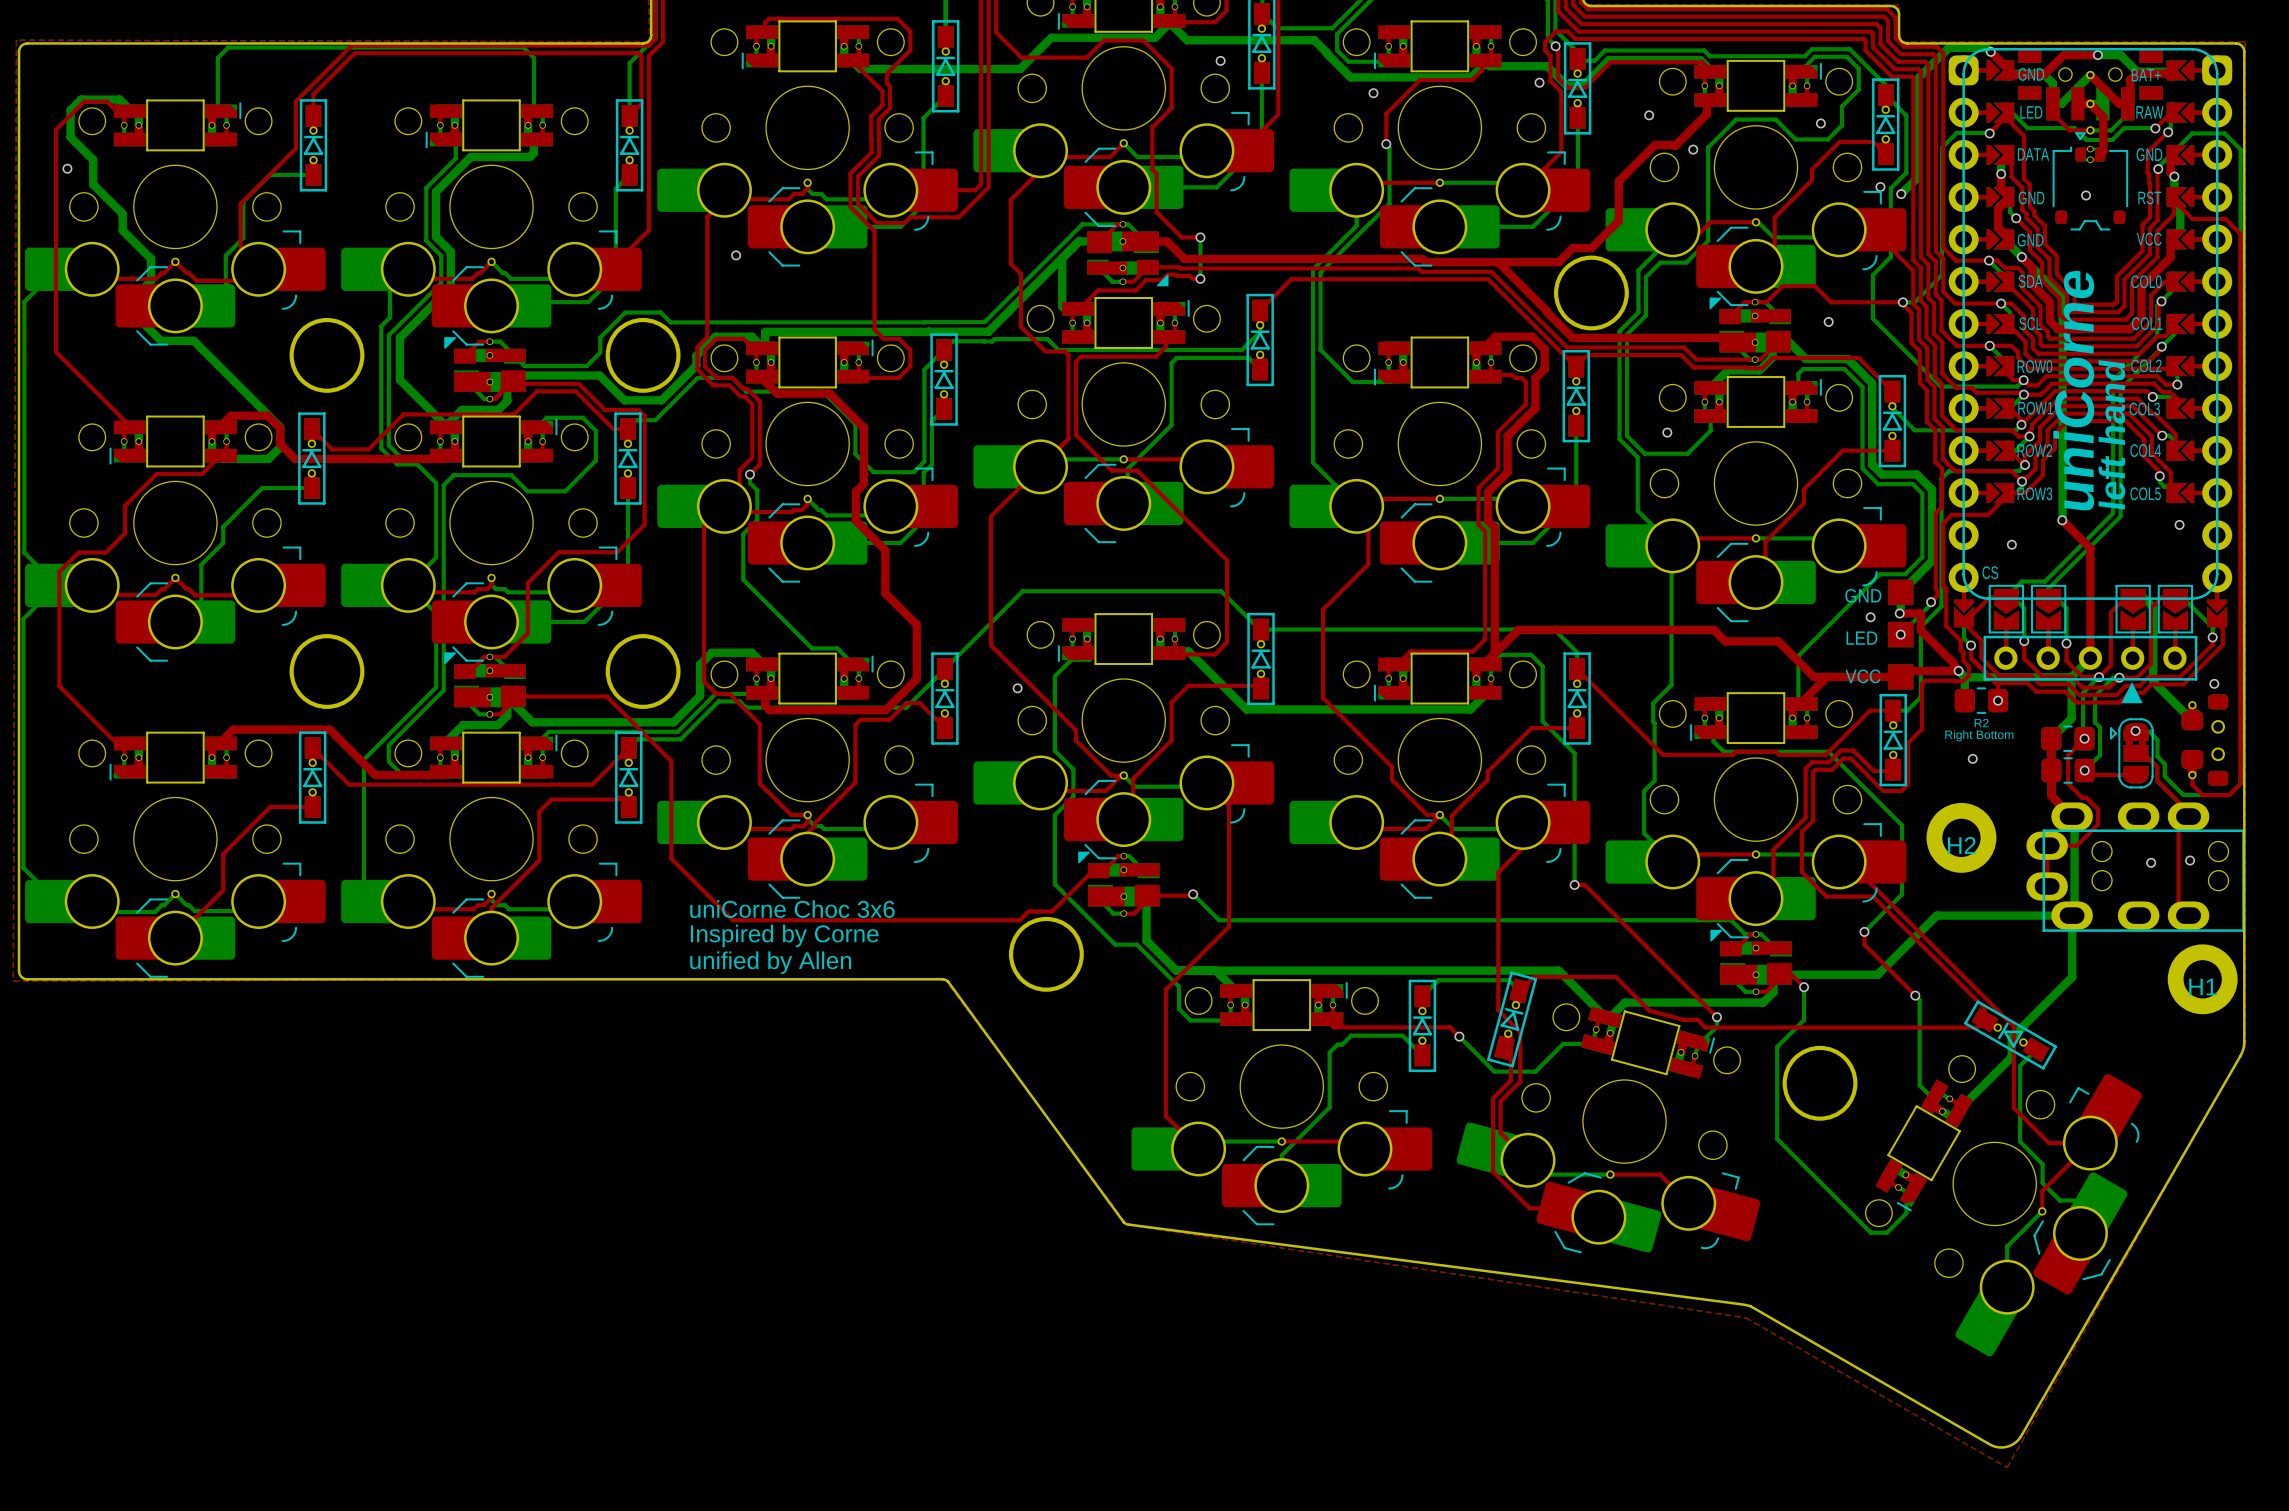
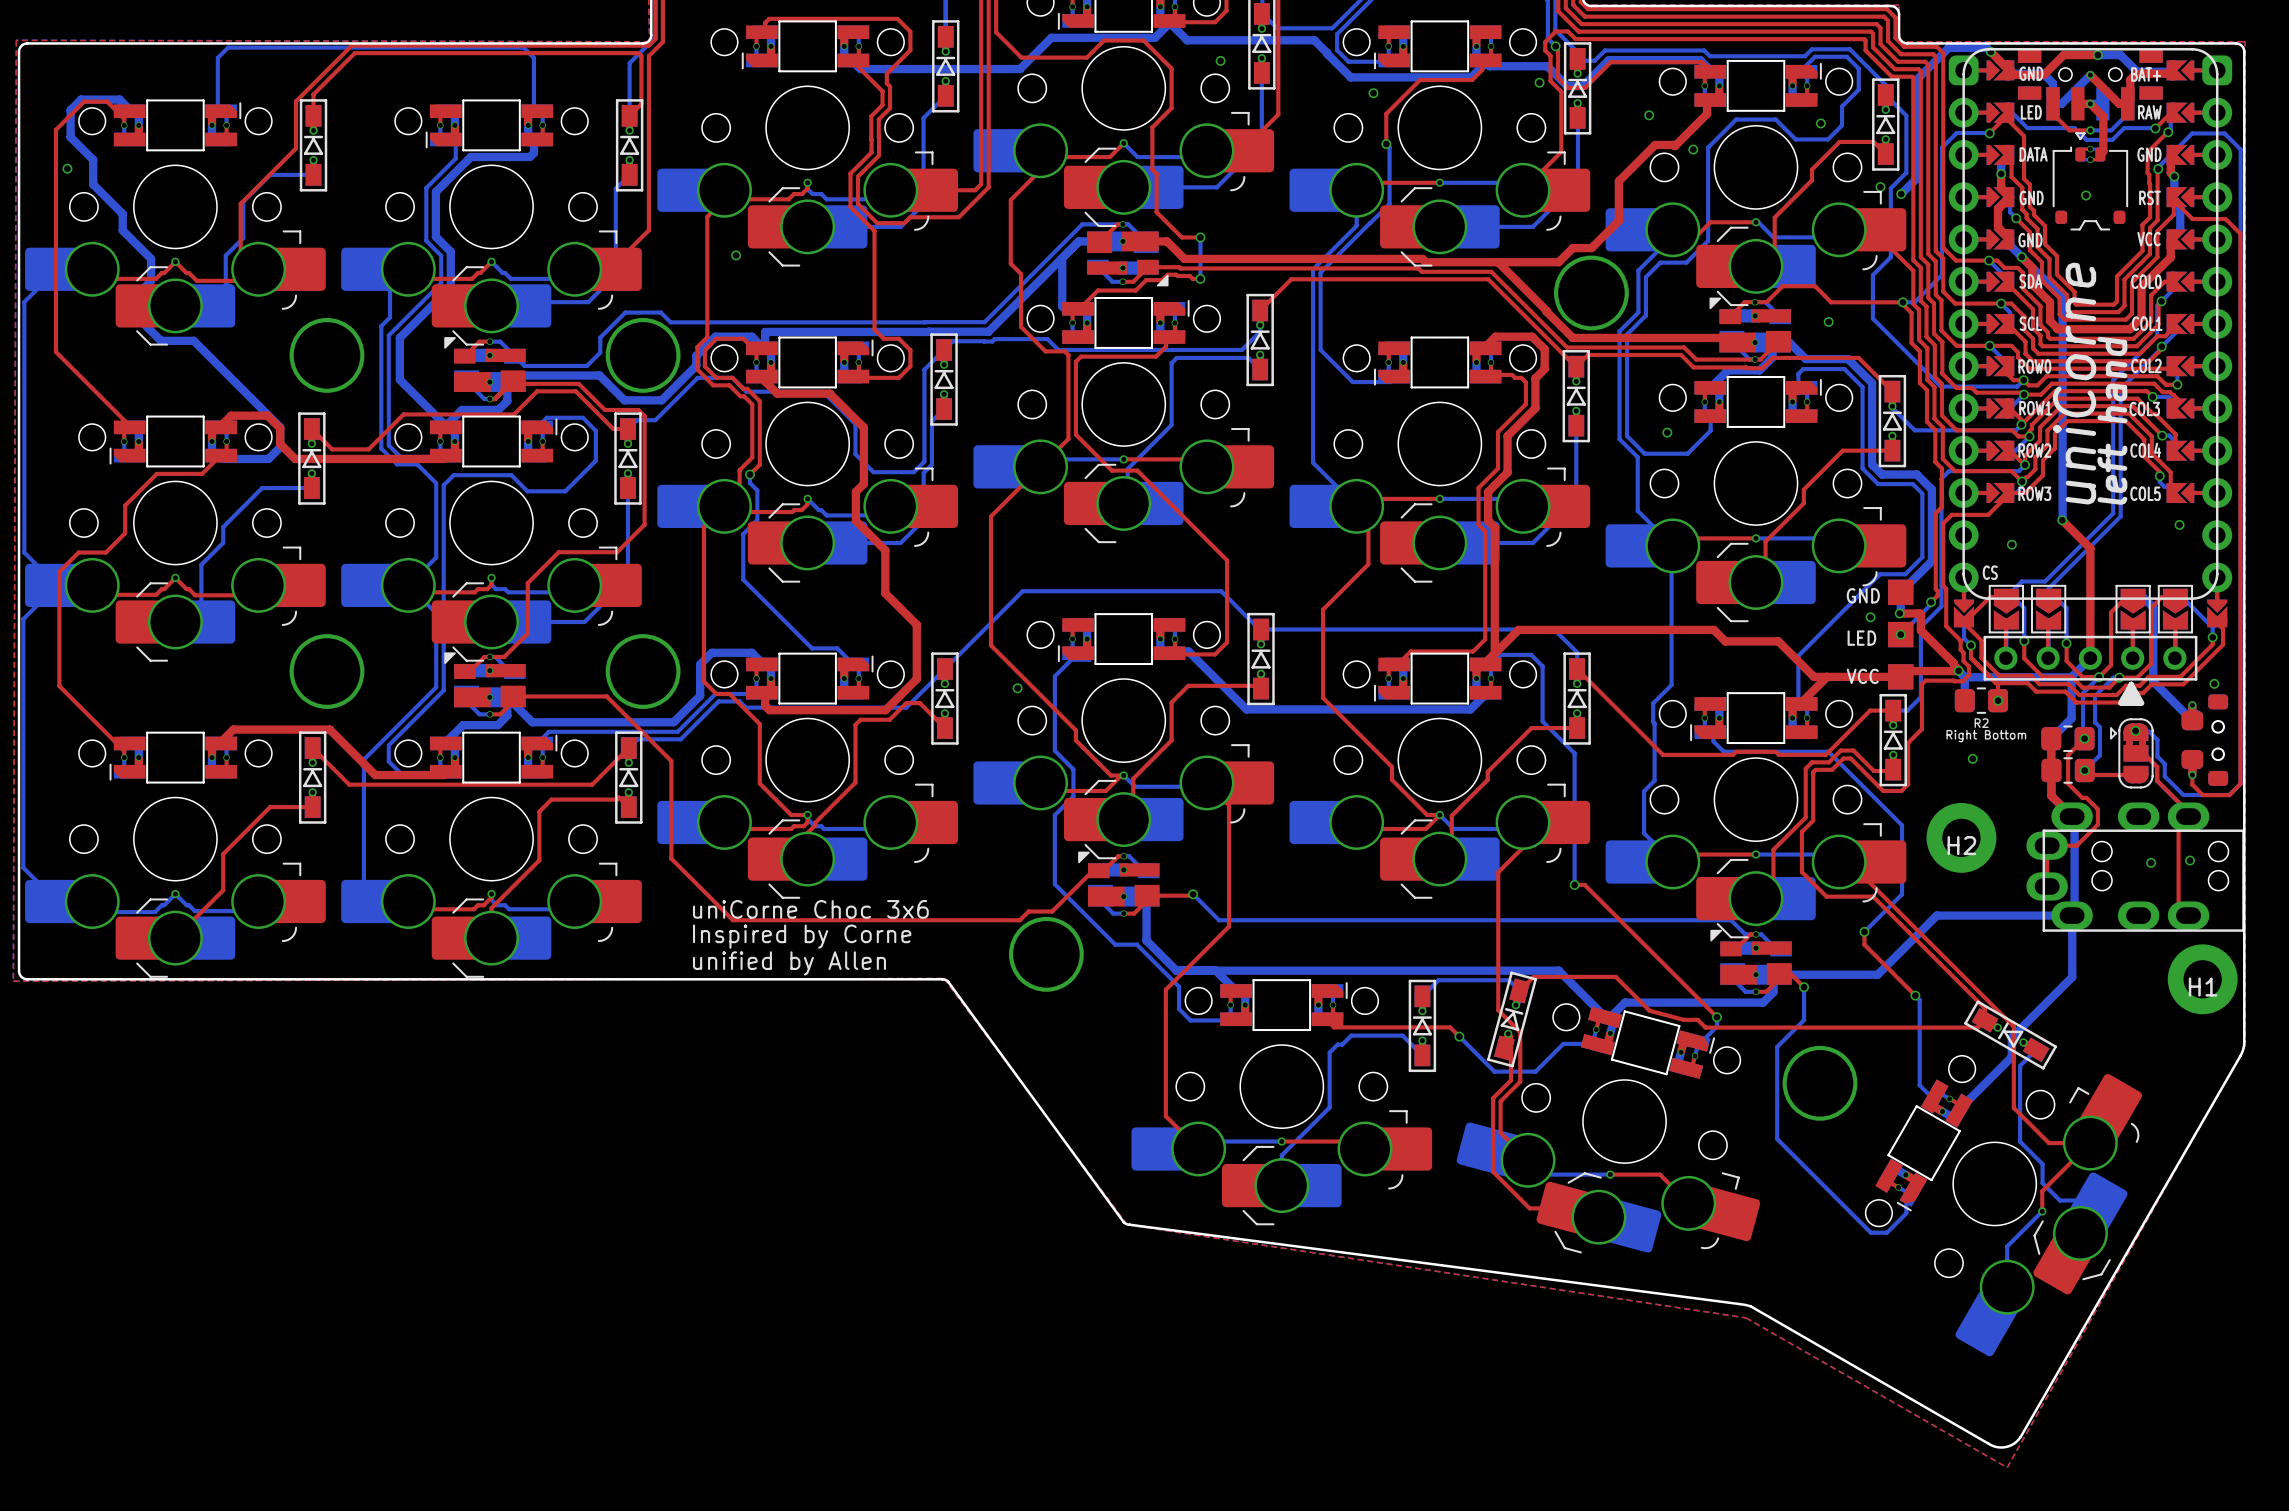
part footprint: [1948, 48, 2233, 628] -> [1948, 48, 2233, 628]

